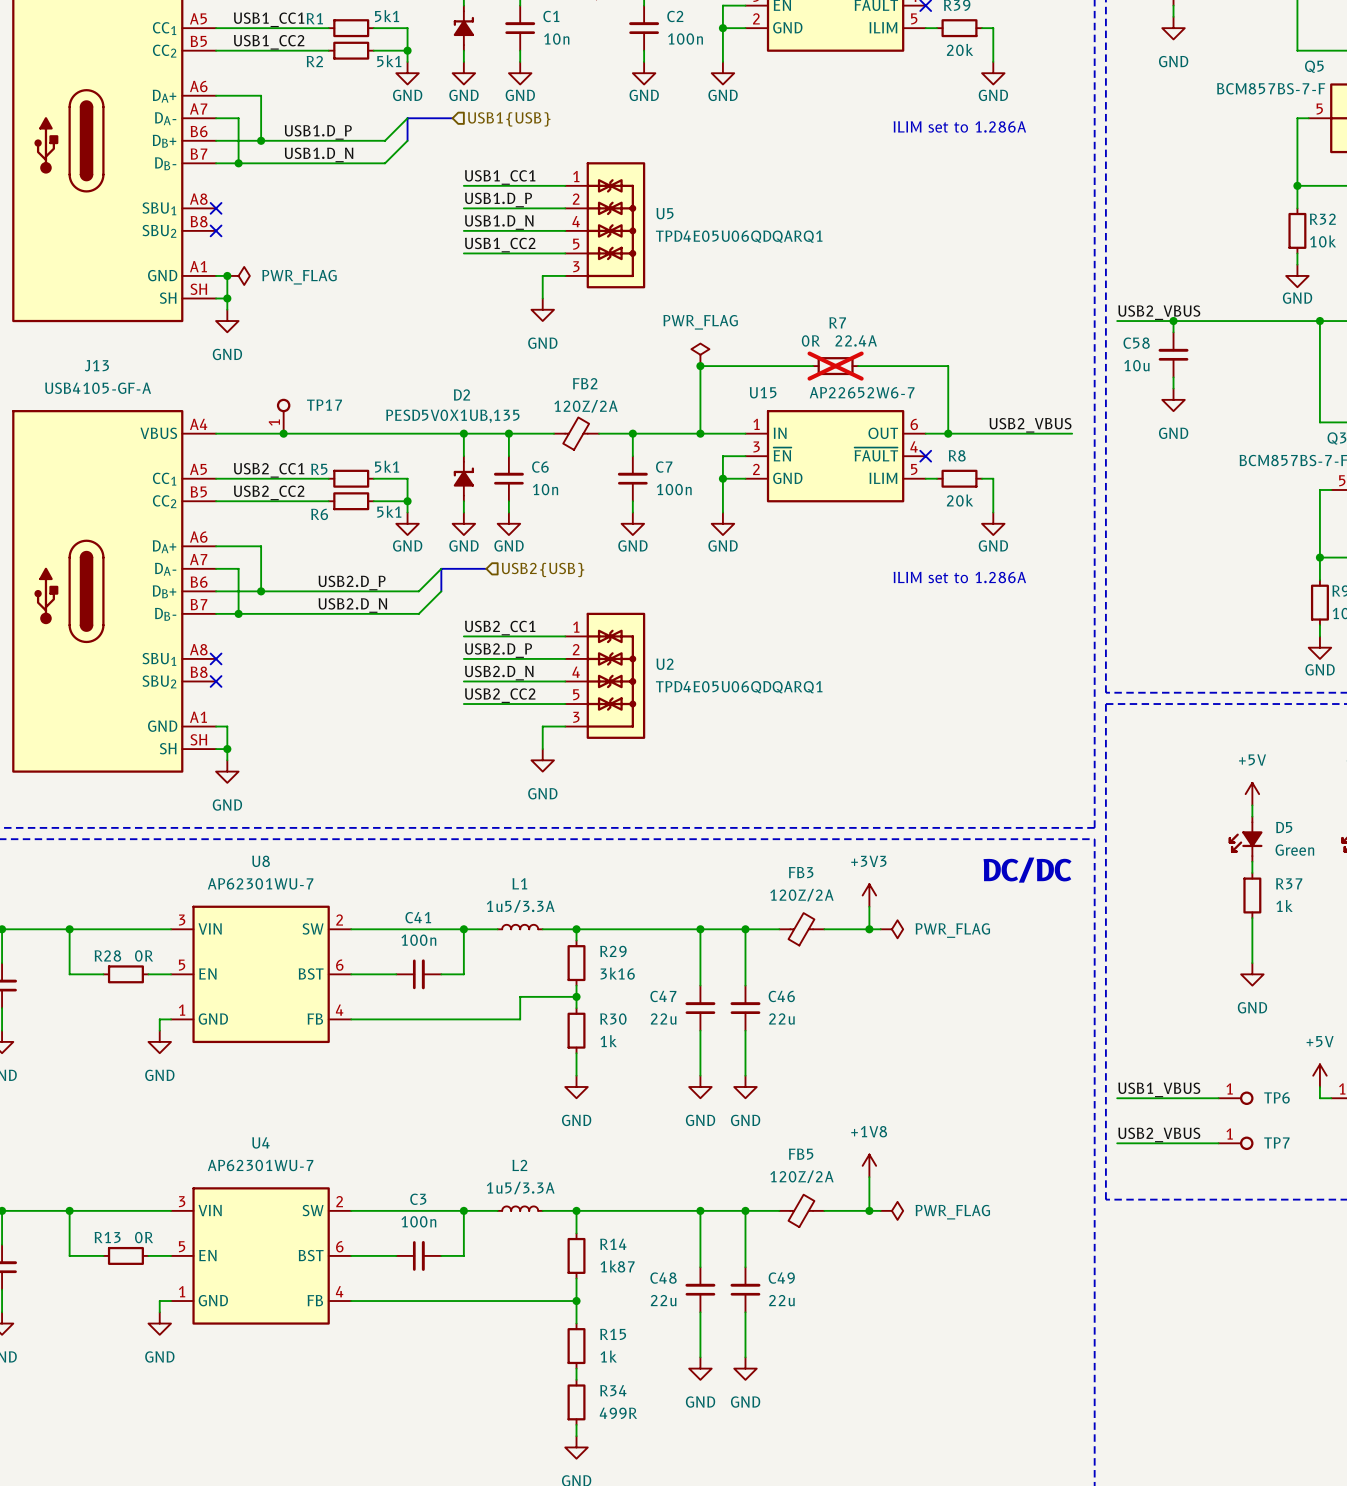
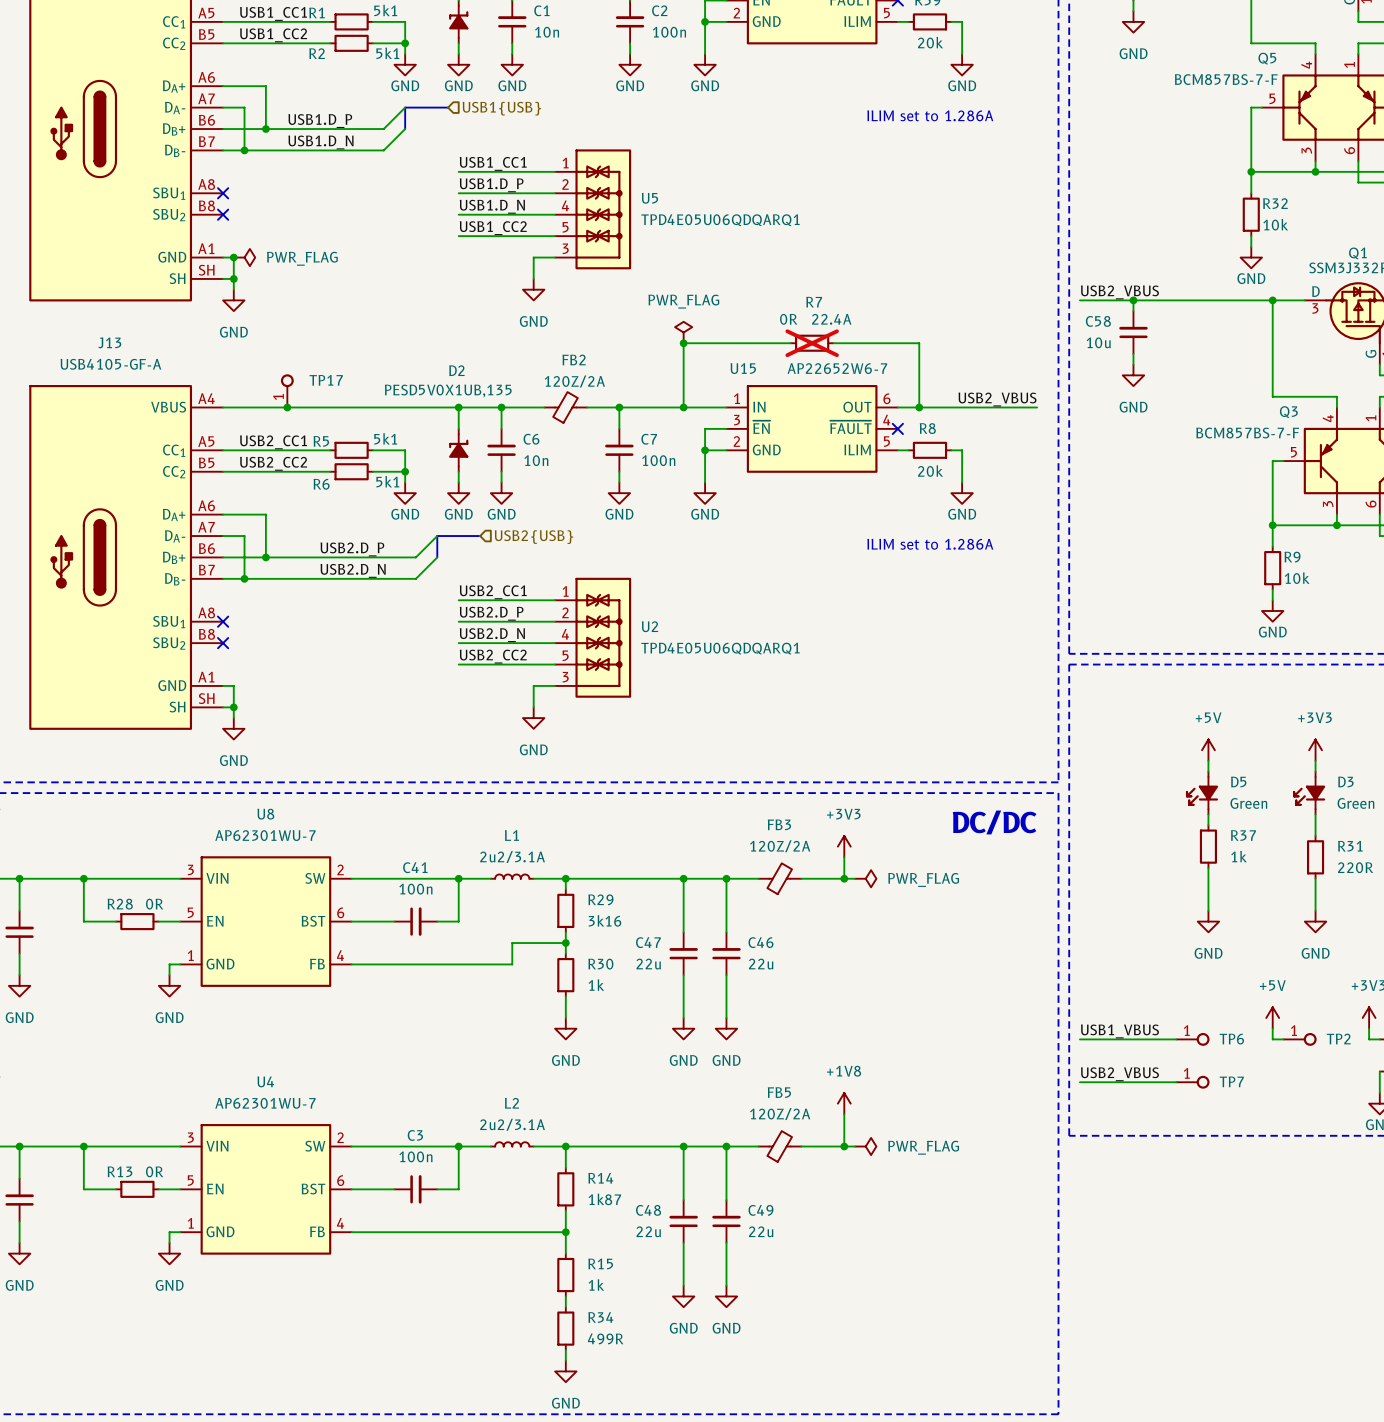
L1 text: 1u5/3.3A (520, 906) -> 2u2/3.1A (512, 857)
L2 text: 1u5/3.3A (520, 1188) -> 2u2/3.1A (512, 1124)

